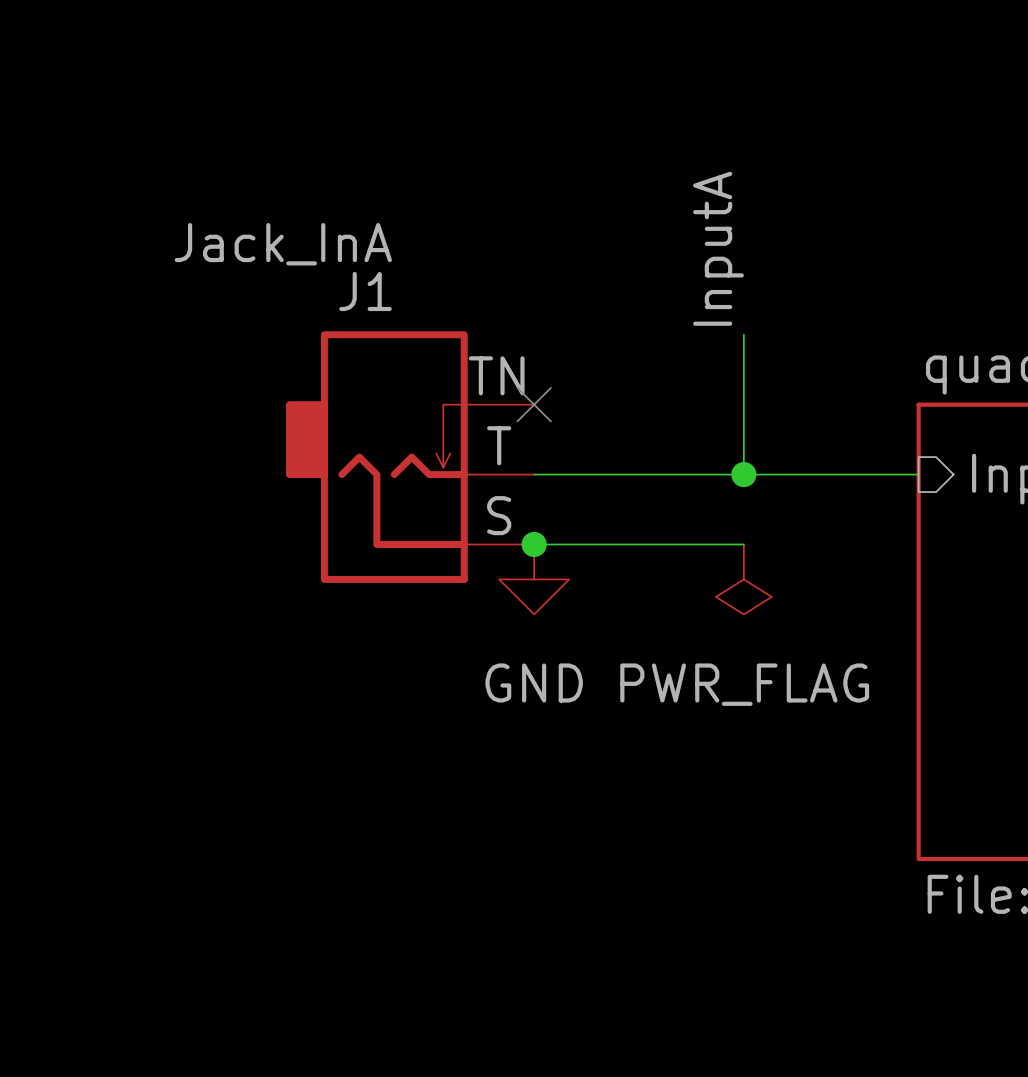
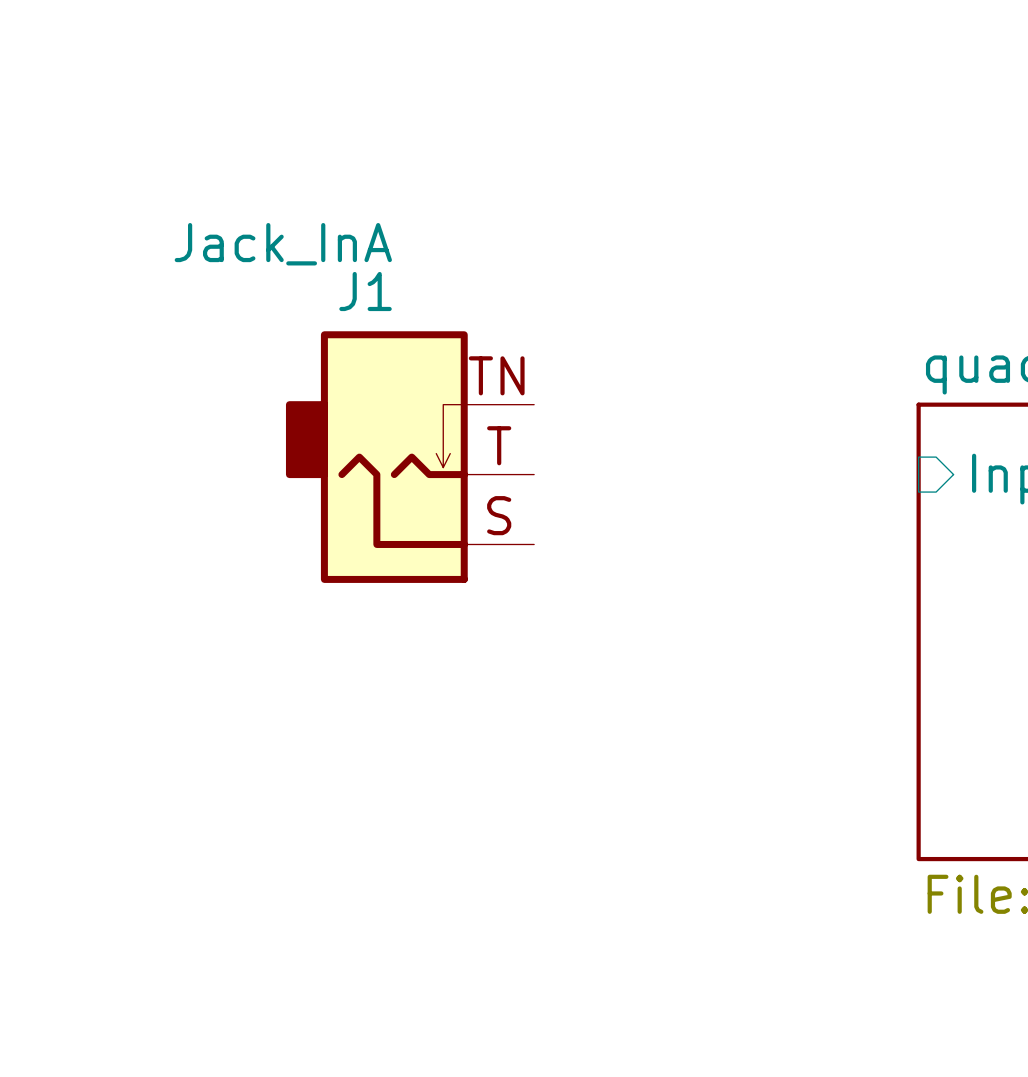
label: InputA (718, 248) -> none
wire: (743, 334) (743, 474) -> none
no-connect mark: (534, 404) -> none
wire: (534, 474) (918, 474) -> none
junction: (743, 474) -> none
wire: (534, 544) (743, 544) -> none
junction: (534, 544) -> none
power symbol: GND (534, 579) -> none
power symbol: PWR_FLAG (743, 579) -> none

